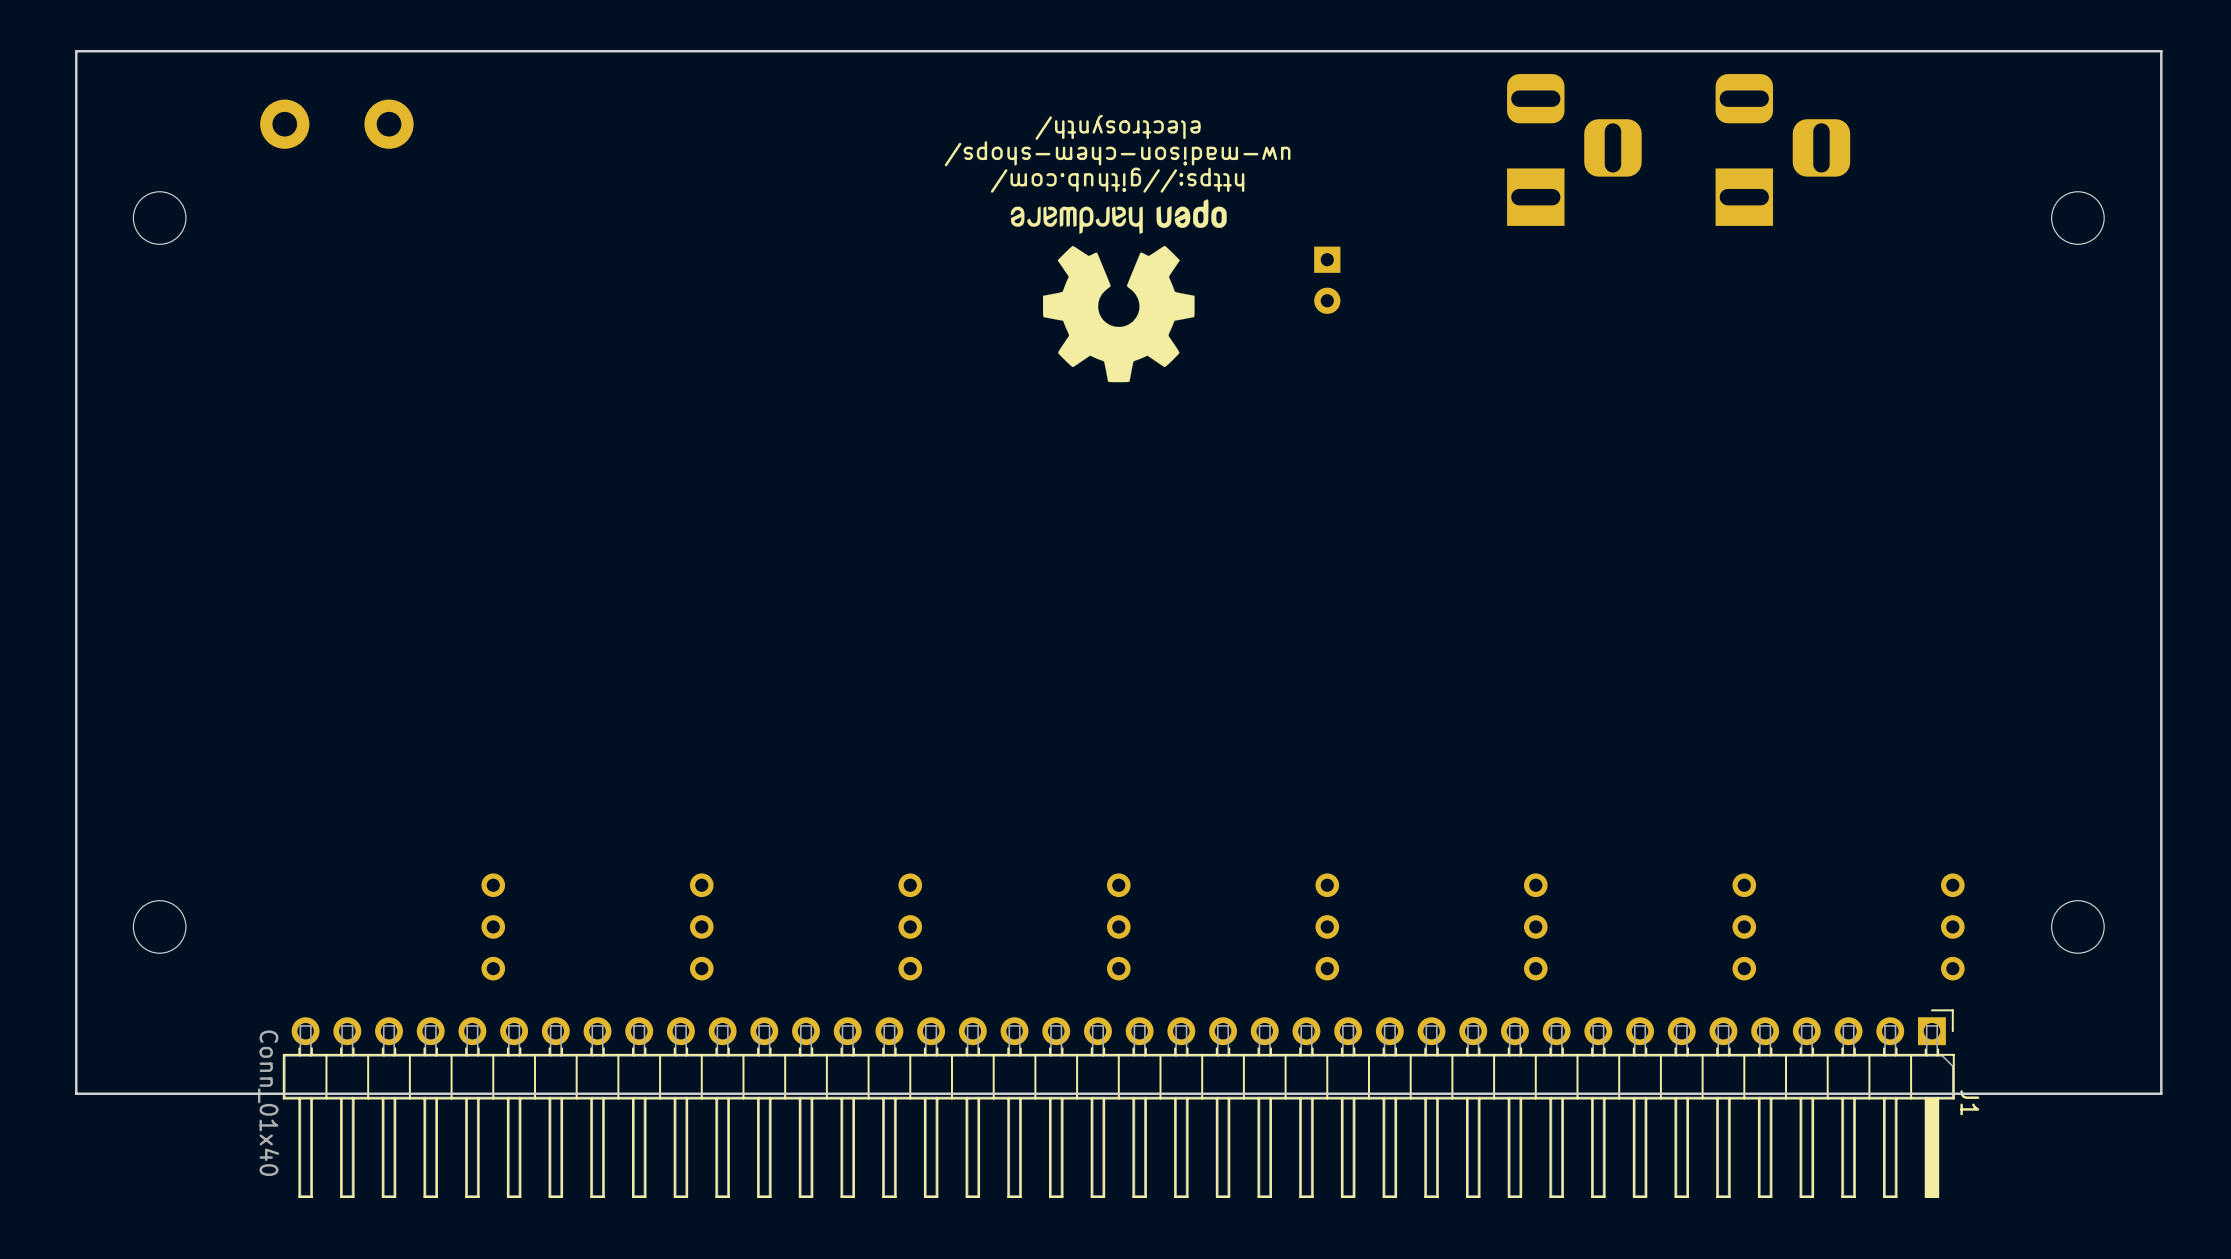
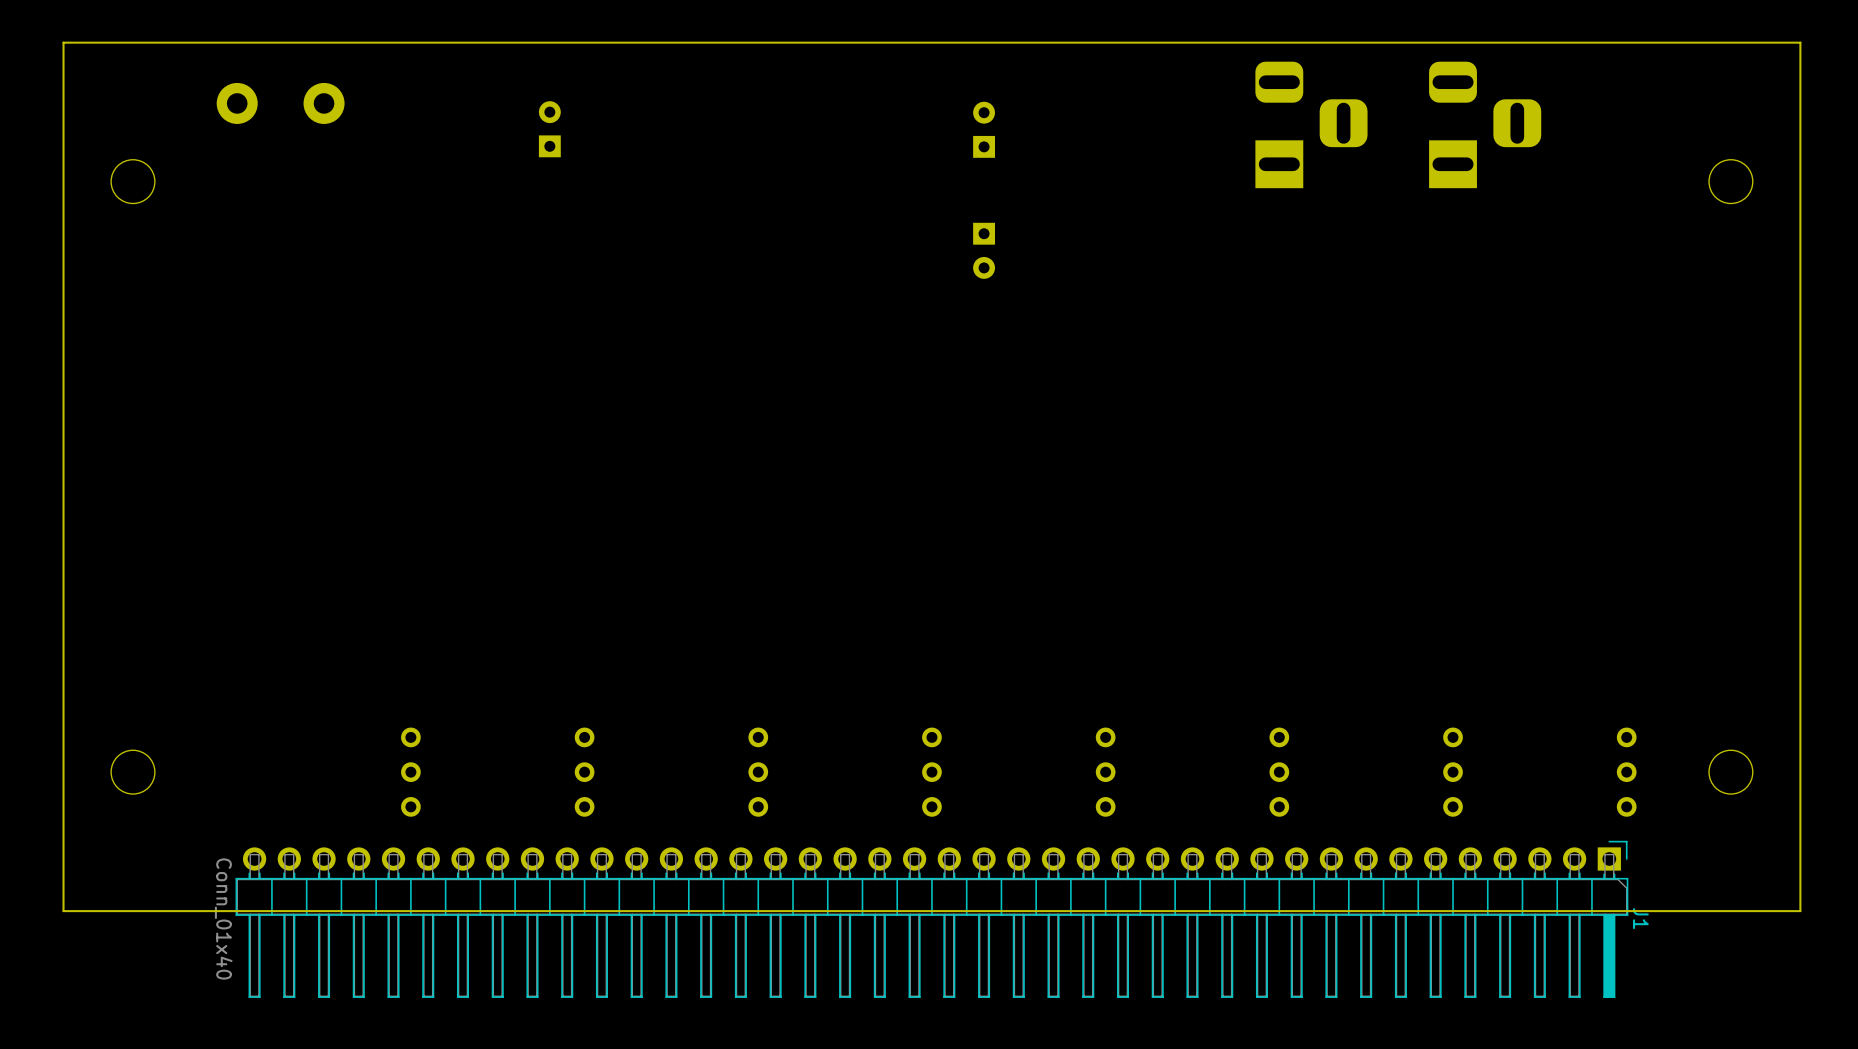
text: electrosynth/ (1118, 127) -> none
text: uw-madison-chem-shops/ (1117, 153) -> none
part: none -> (549, 129)
part: none -> (984, 129)
text: https://github.com/ (1117, 180) -> none
drawing: [1010, 199, 1227, 383] -> none
part: (1327, 280) -> none
part: none -> (984, 250)

